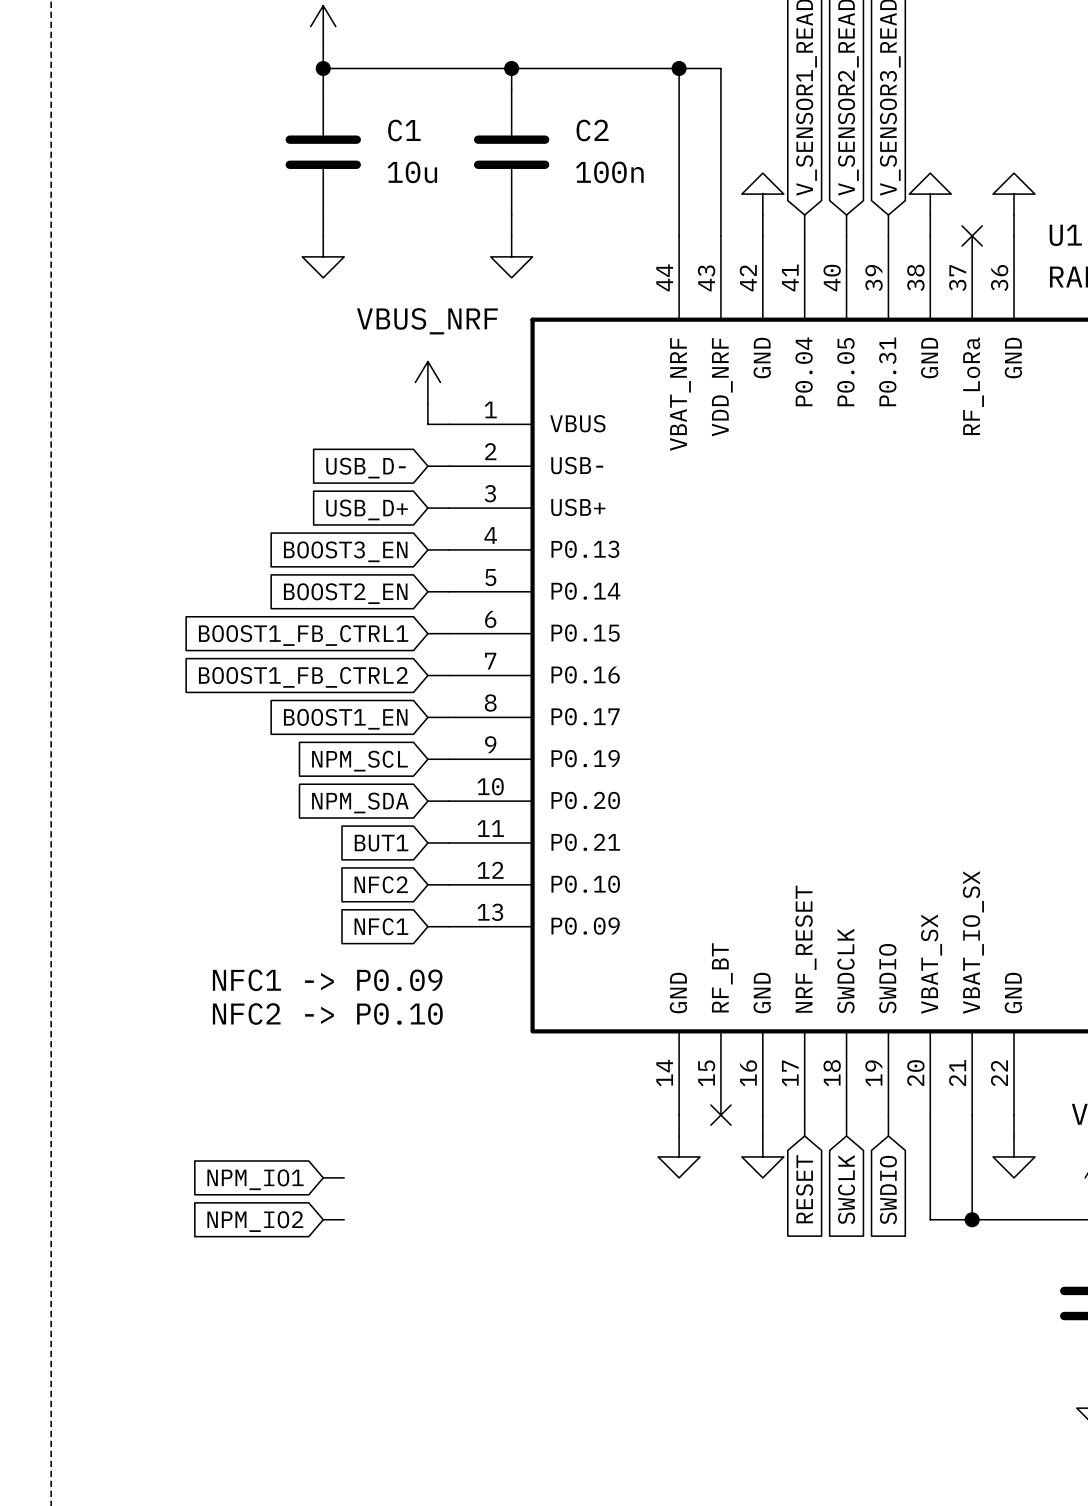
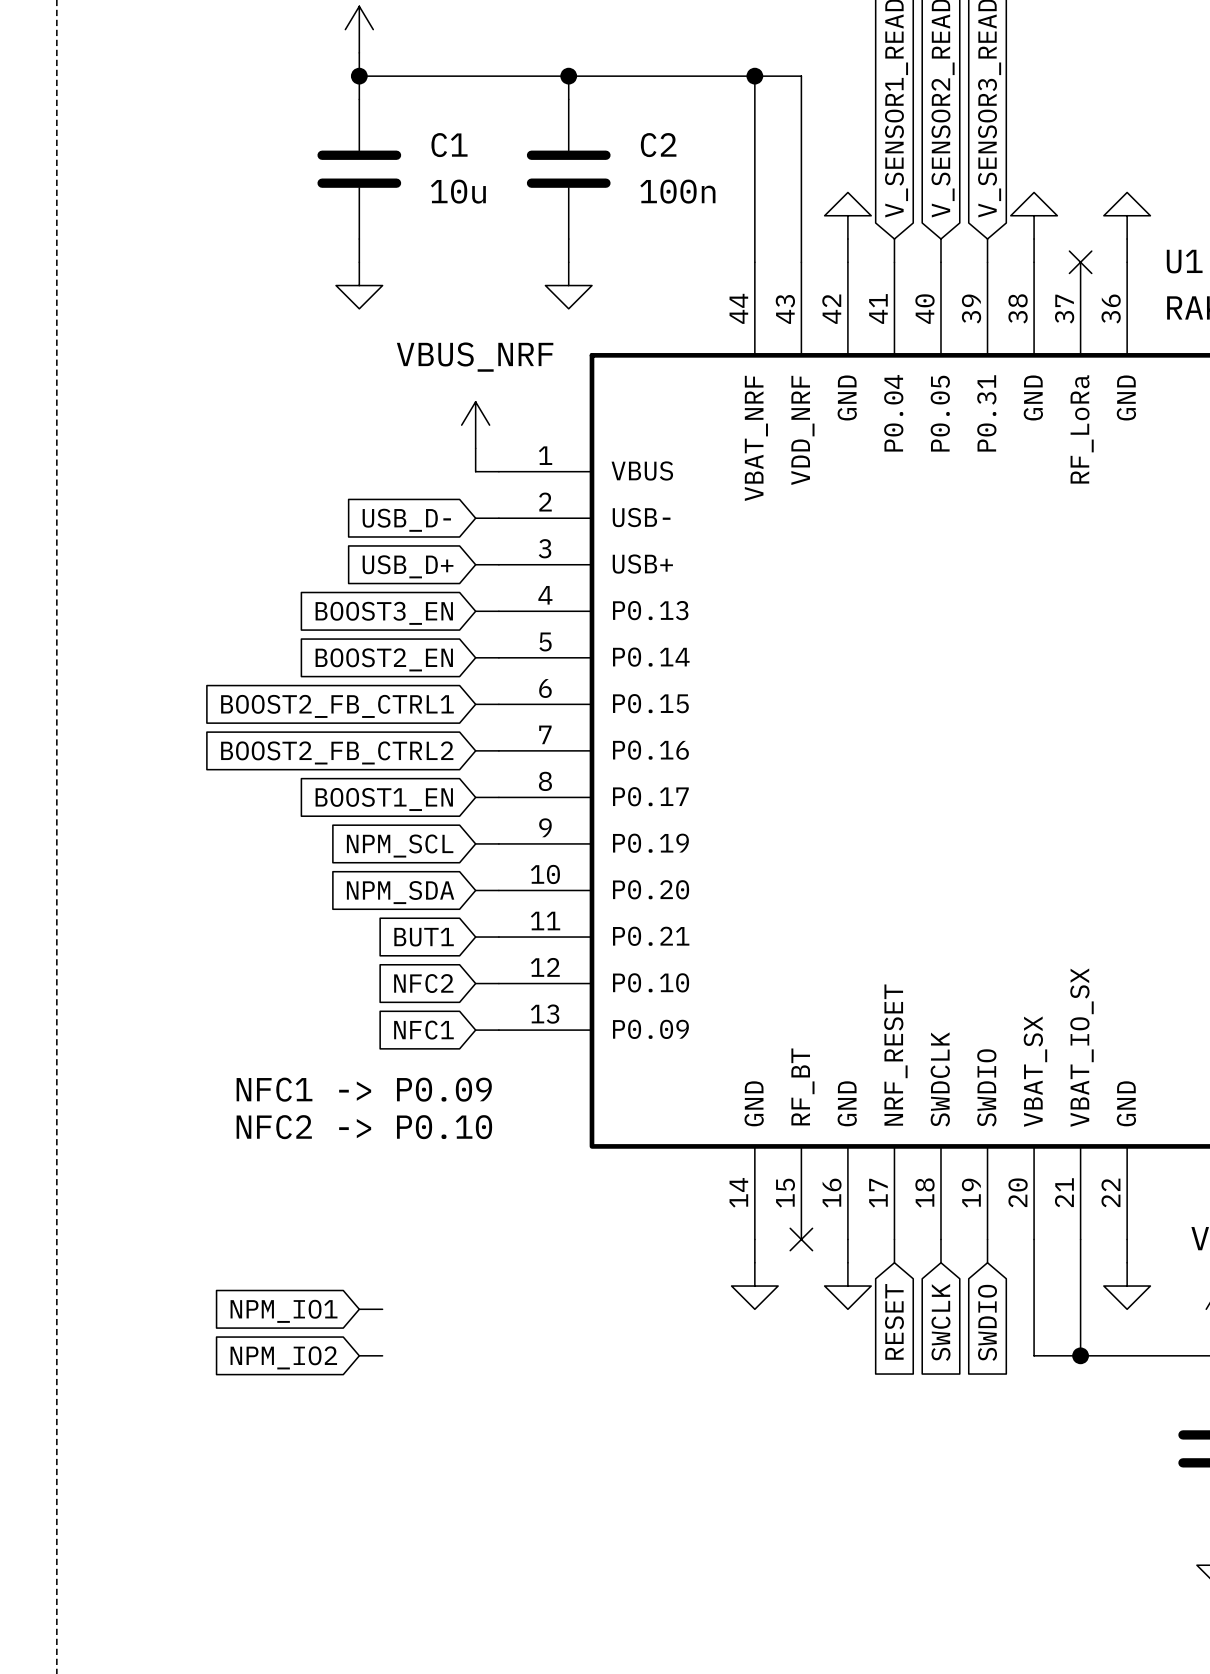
global label: BOOST1_FB_CTRL1 (303, 635) -> BOOST2_FB_CTRL1 (337, 706)
global label: BOOST1_FB_CTRL2 (303, 677) -> BOOST2_FB_CTRL2 (337, 752)

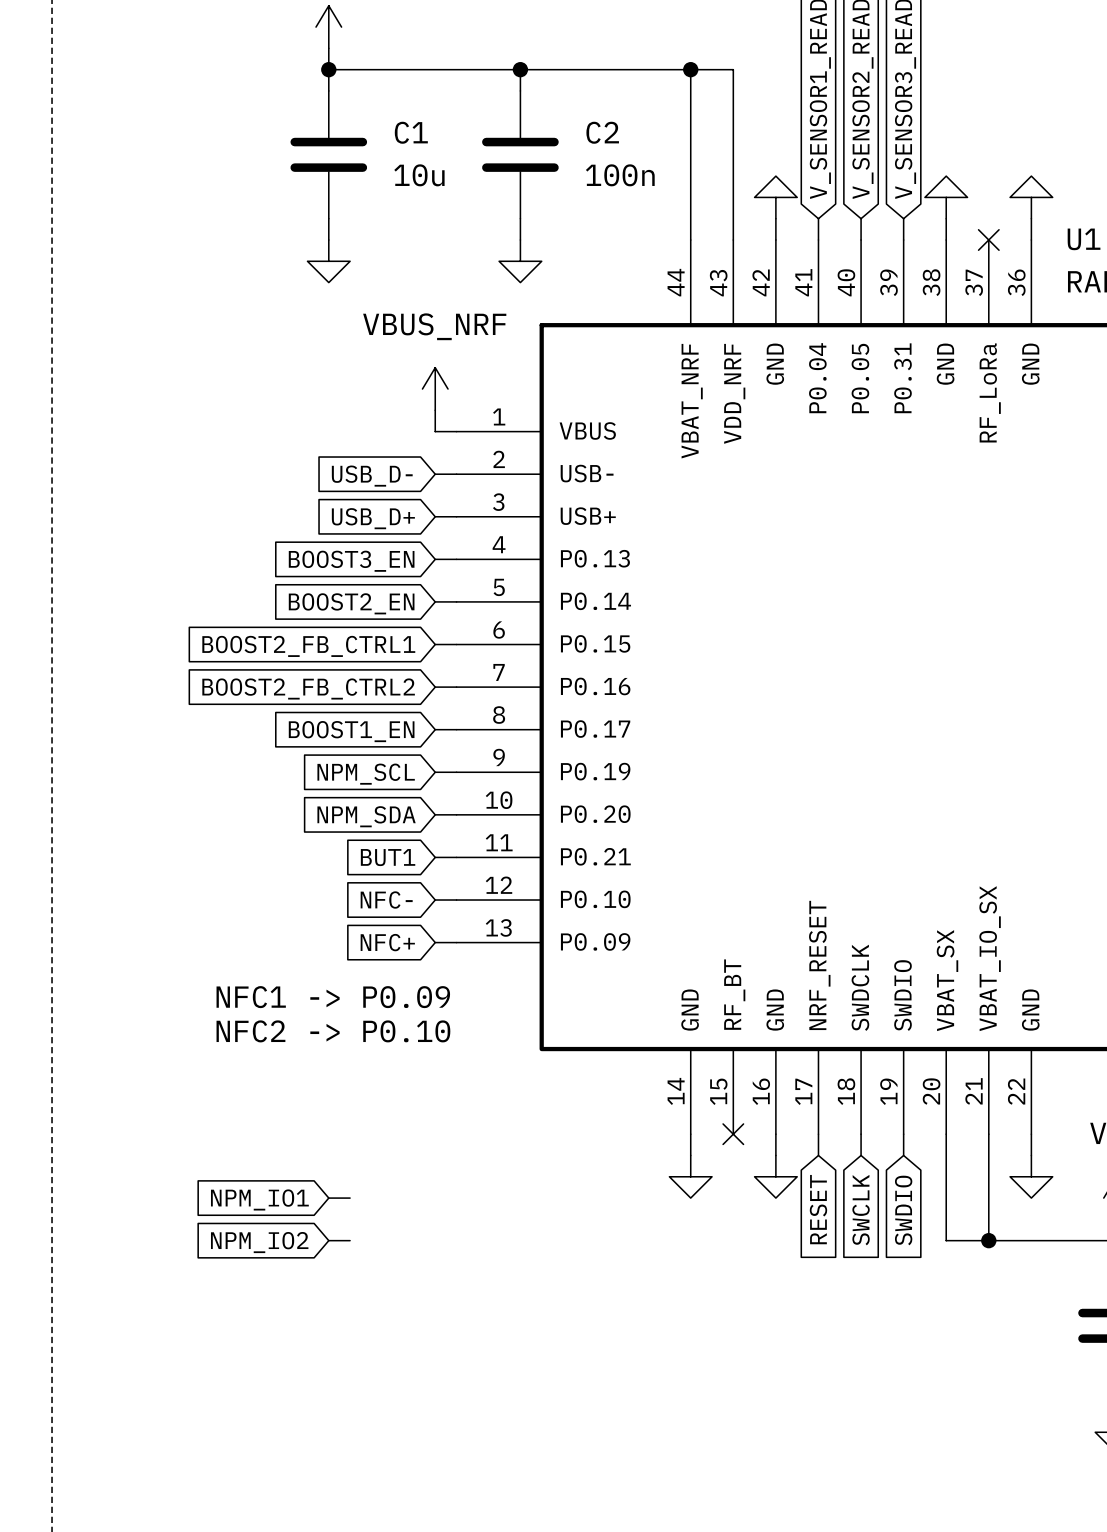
global label: NFC2 (423, 983) -> NFC- (386, 900)
global label: NFC1 (423, 1030) -> NFC+ (387, 942)

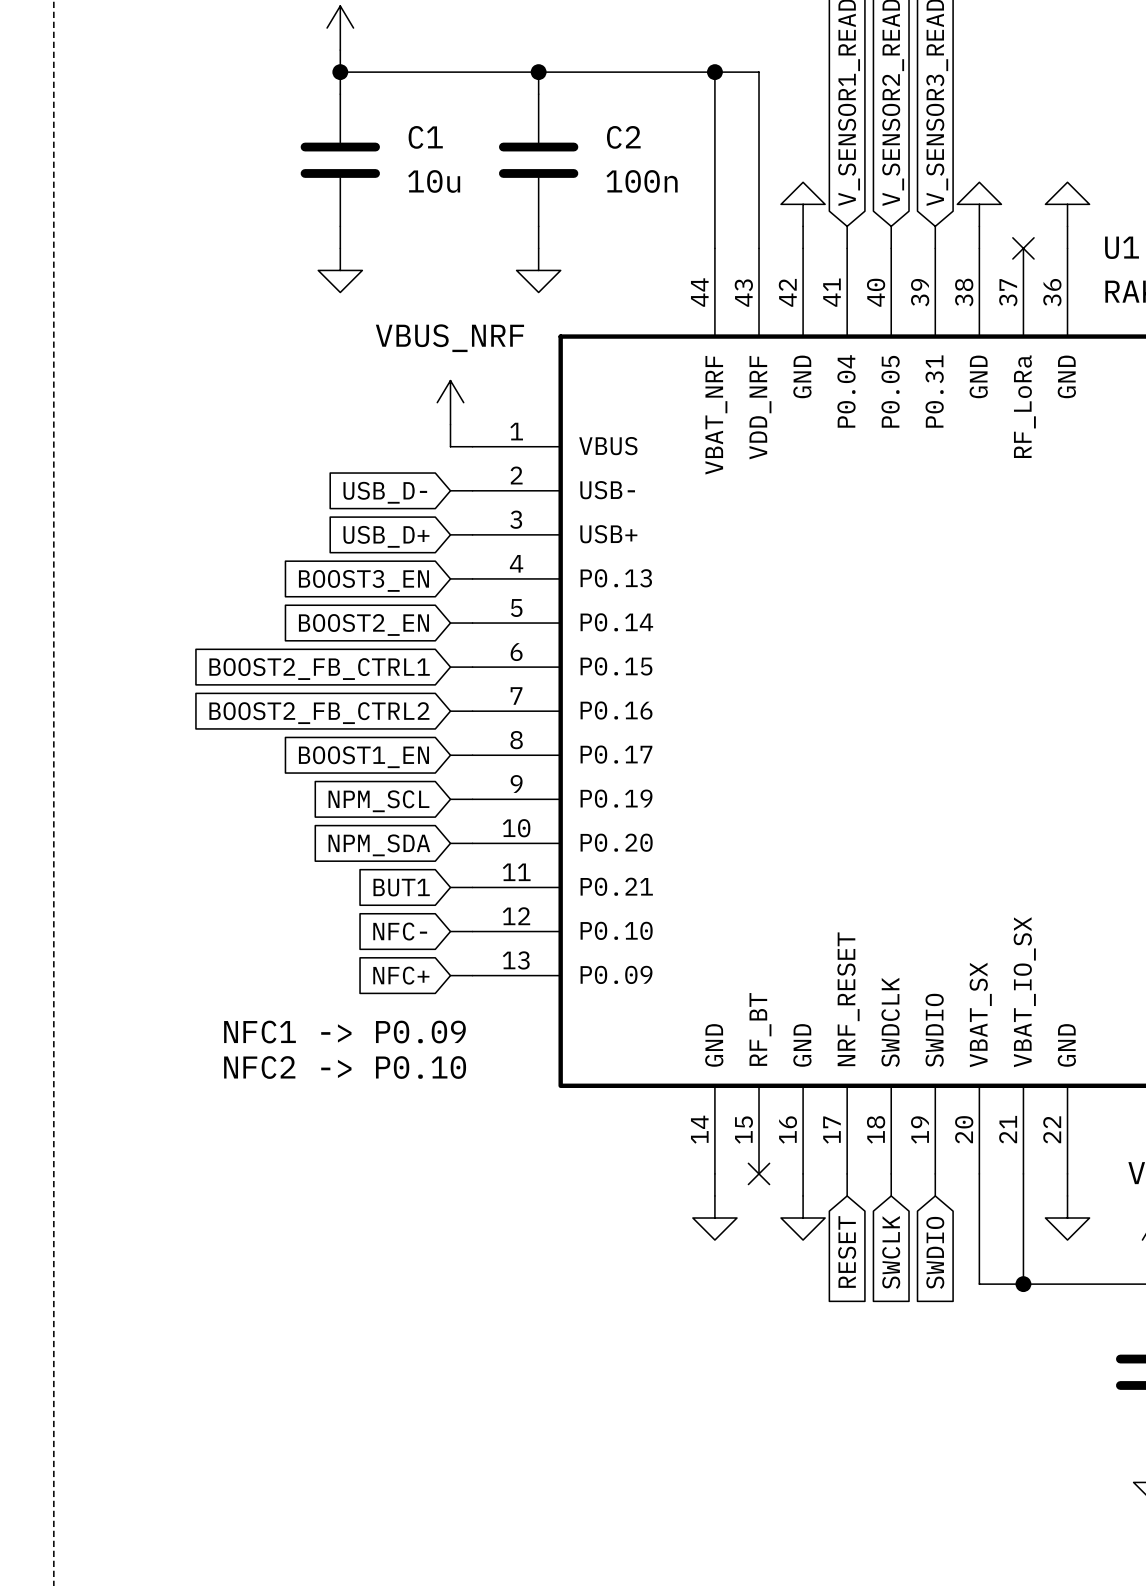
wire: (328, 1198) (350, 1198) -> none
global label: NPM_IO1 (259, 1199) -> none
wire: (328, 1240) (350, 1240) -> none
global label: NPM_IO2 (259, 1242) -> none

